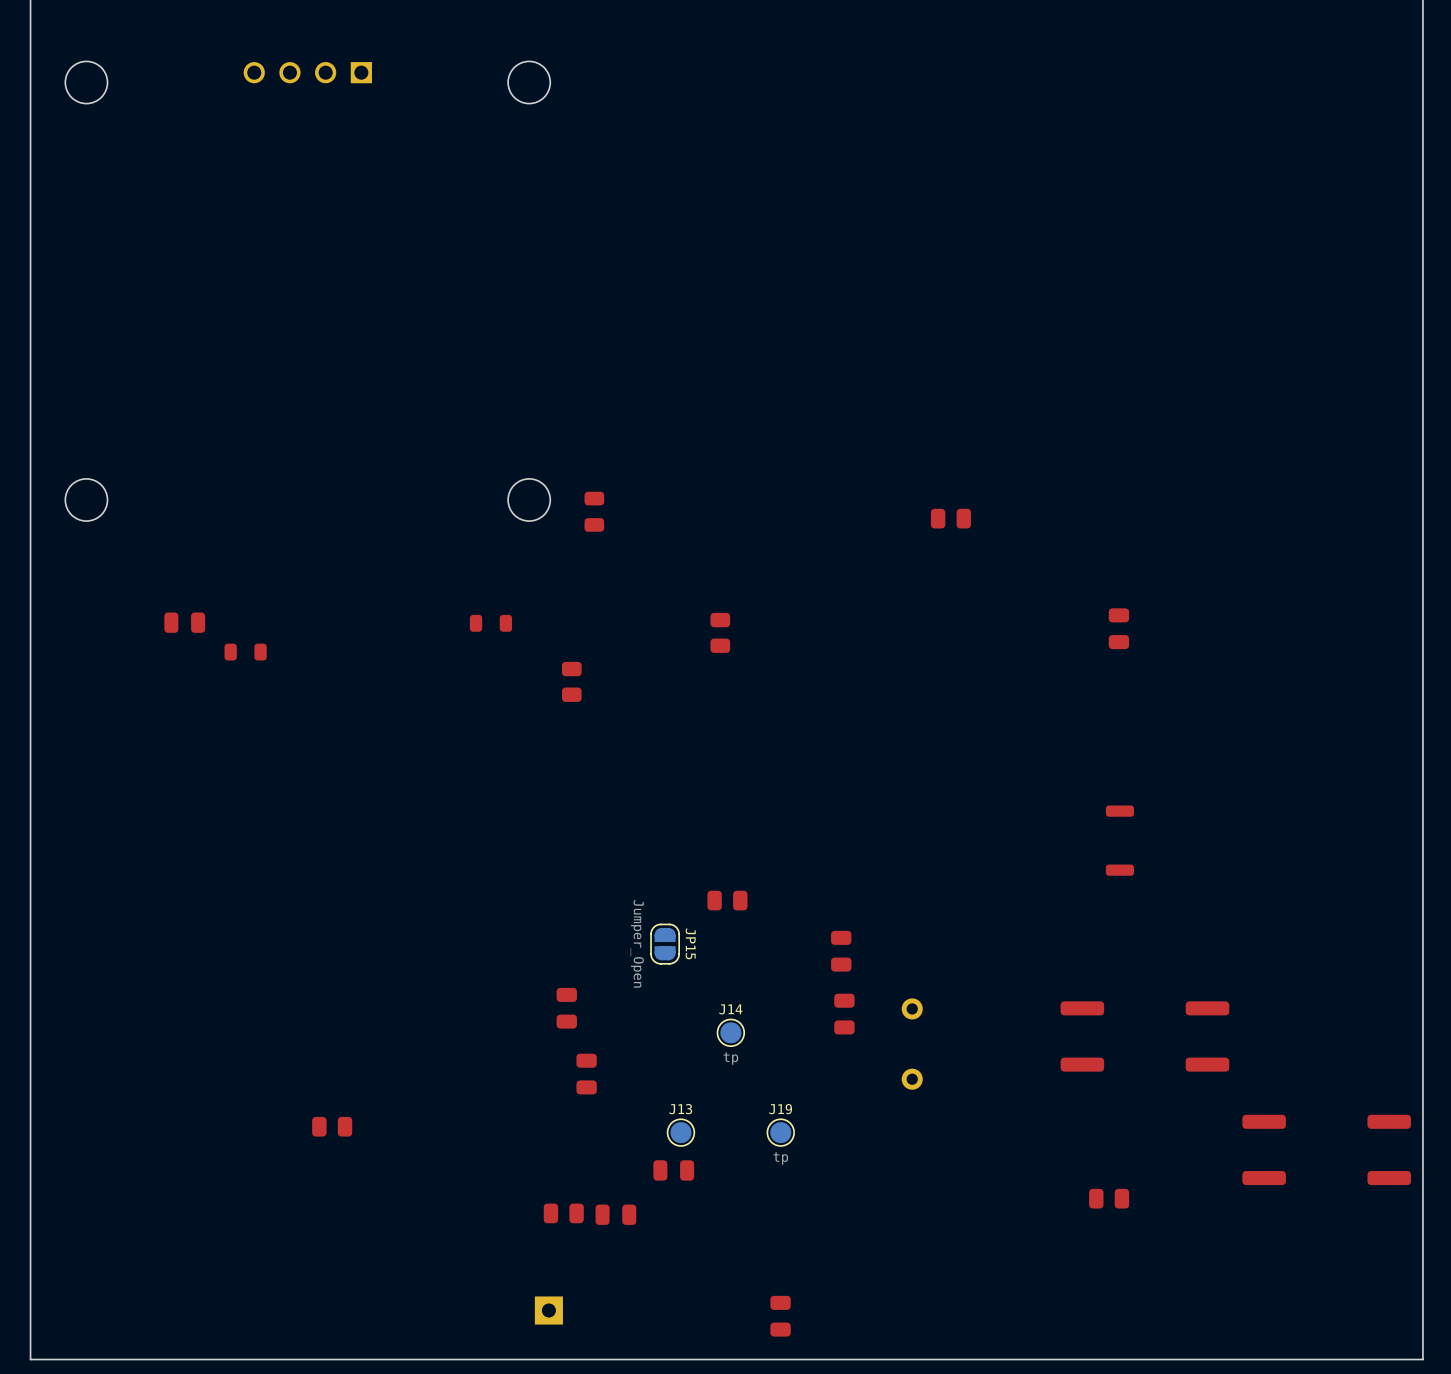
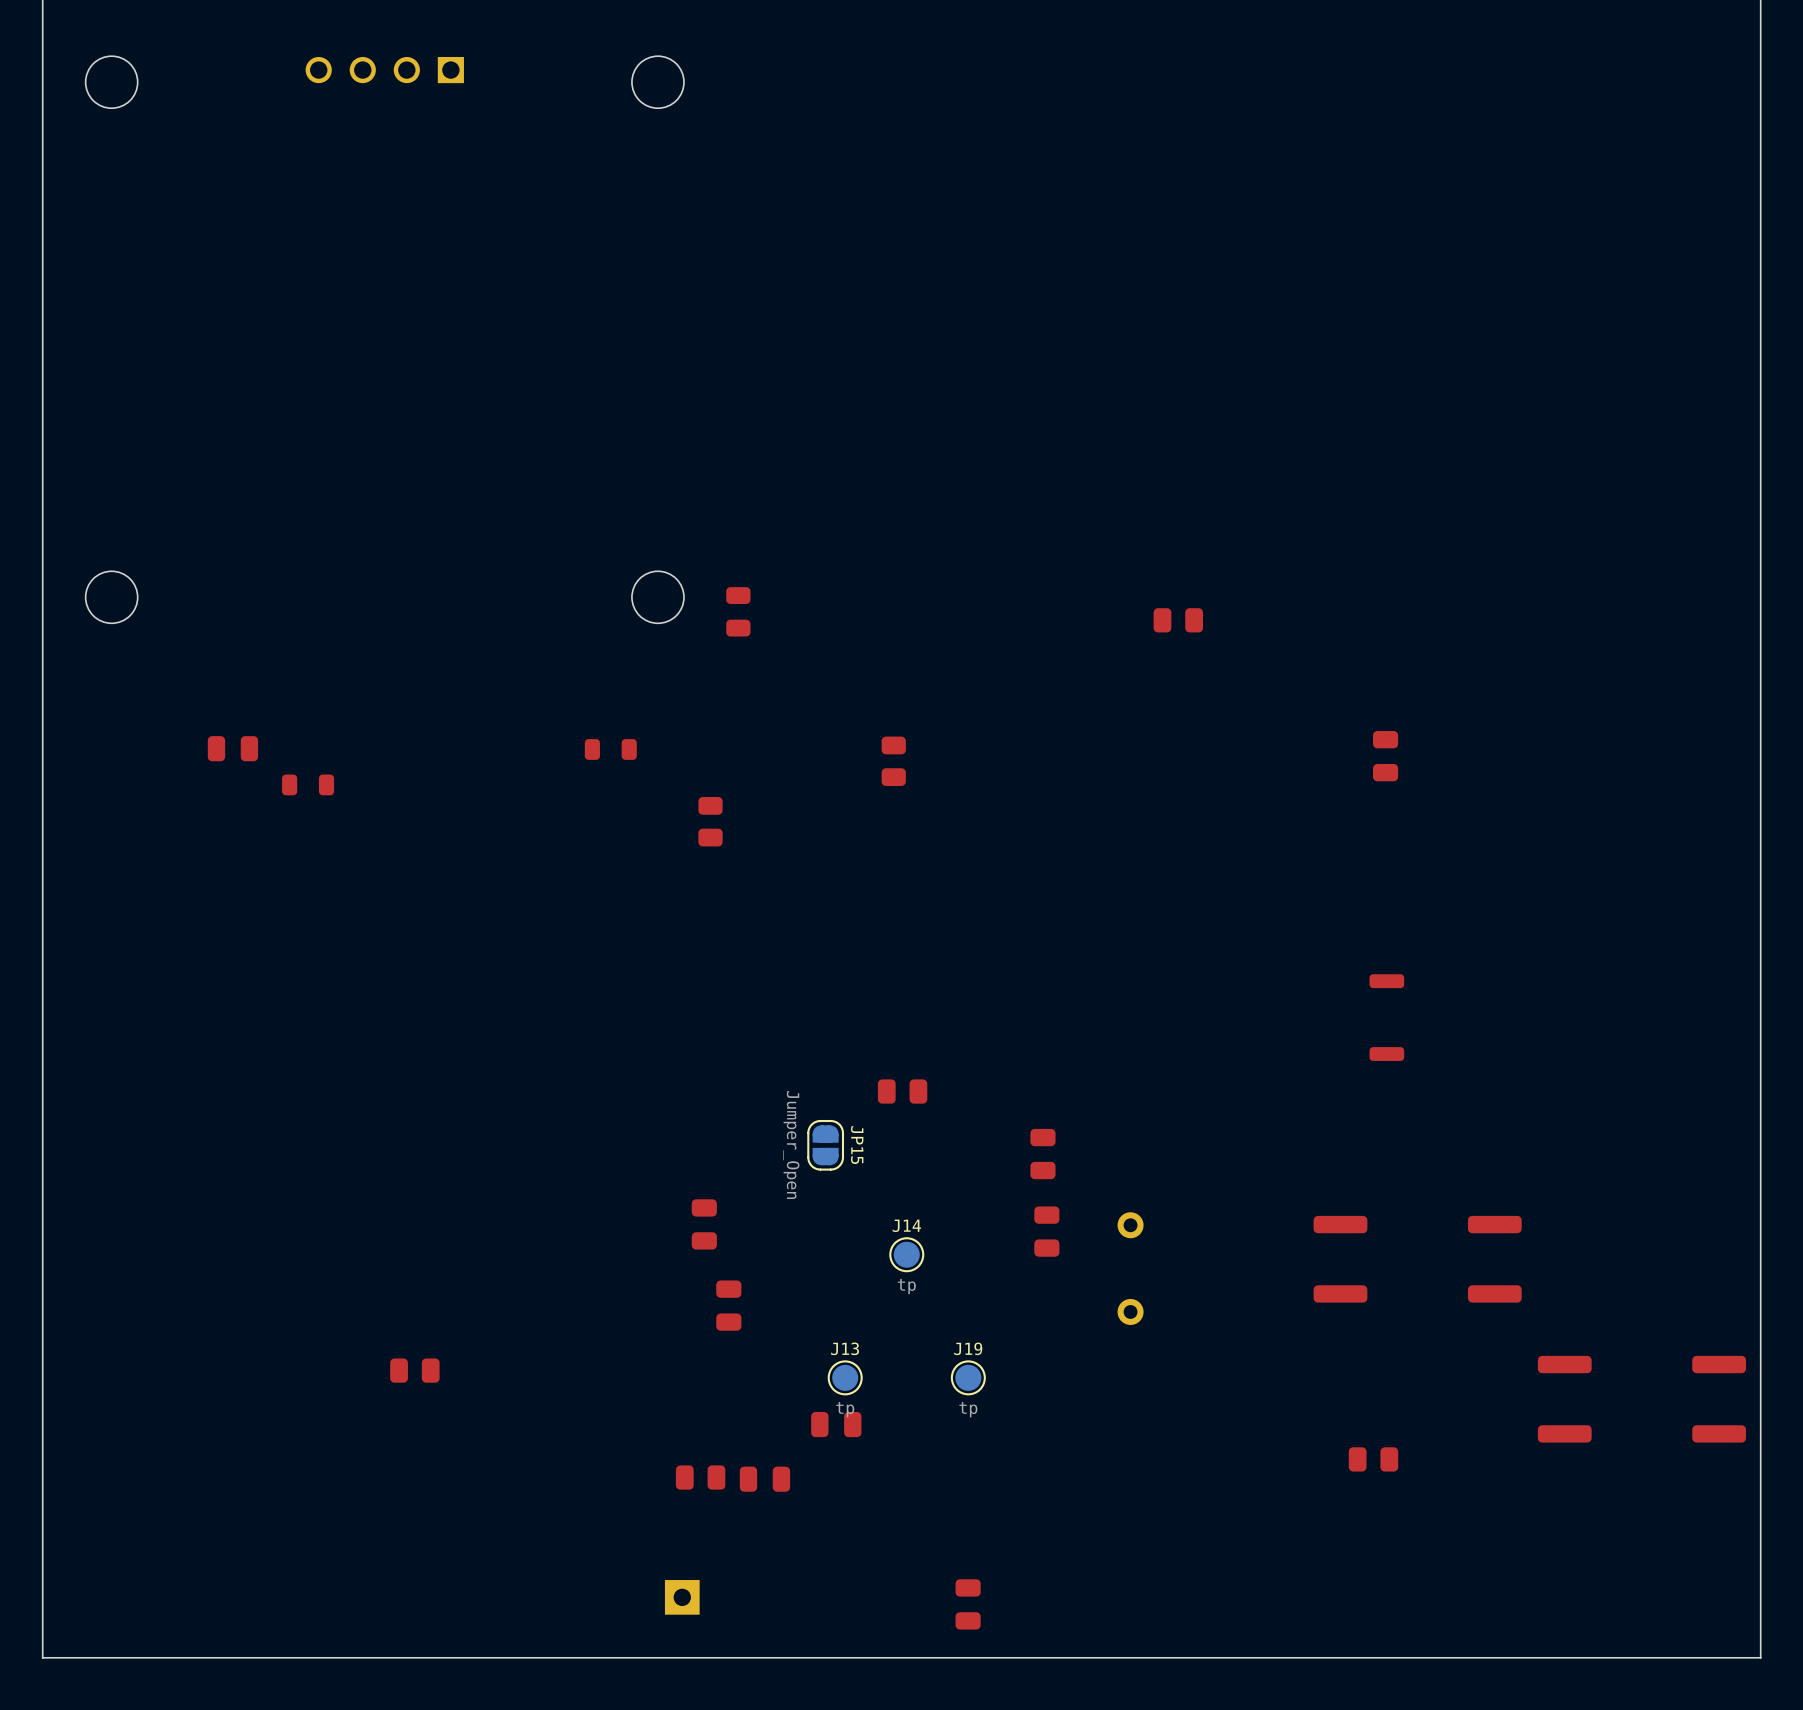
J13 value: none -> tp (845, 1409)

